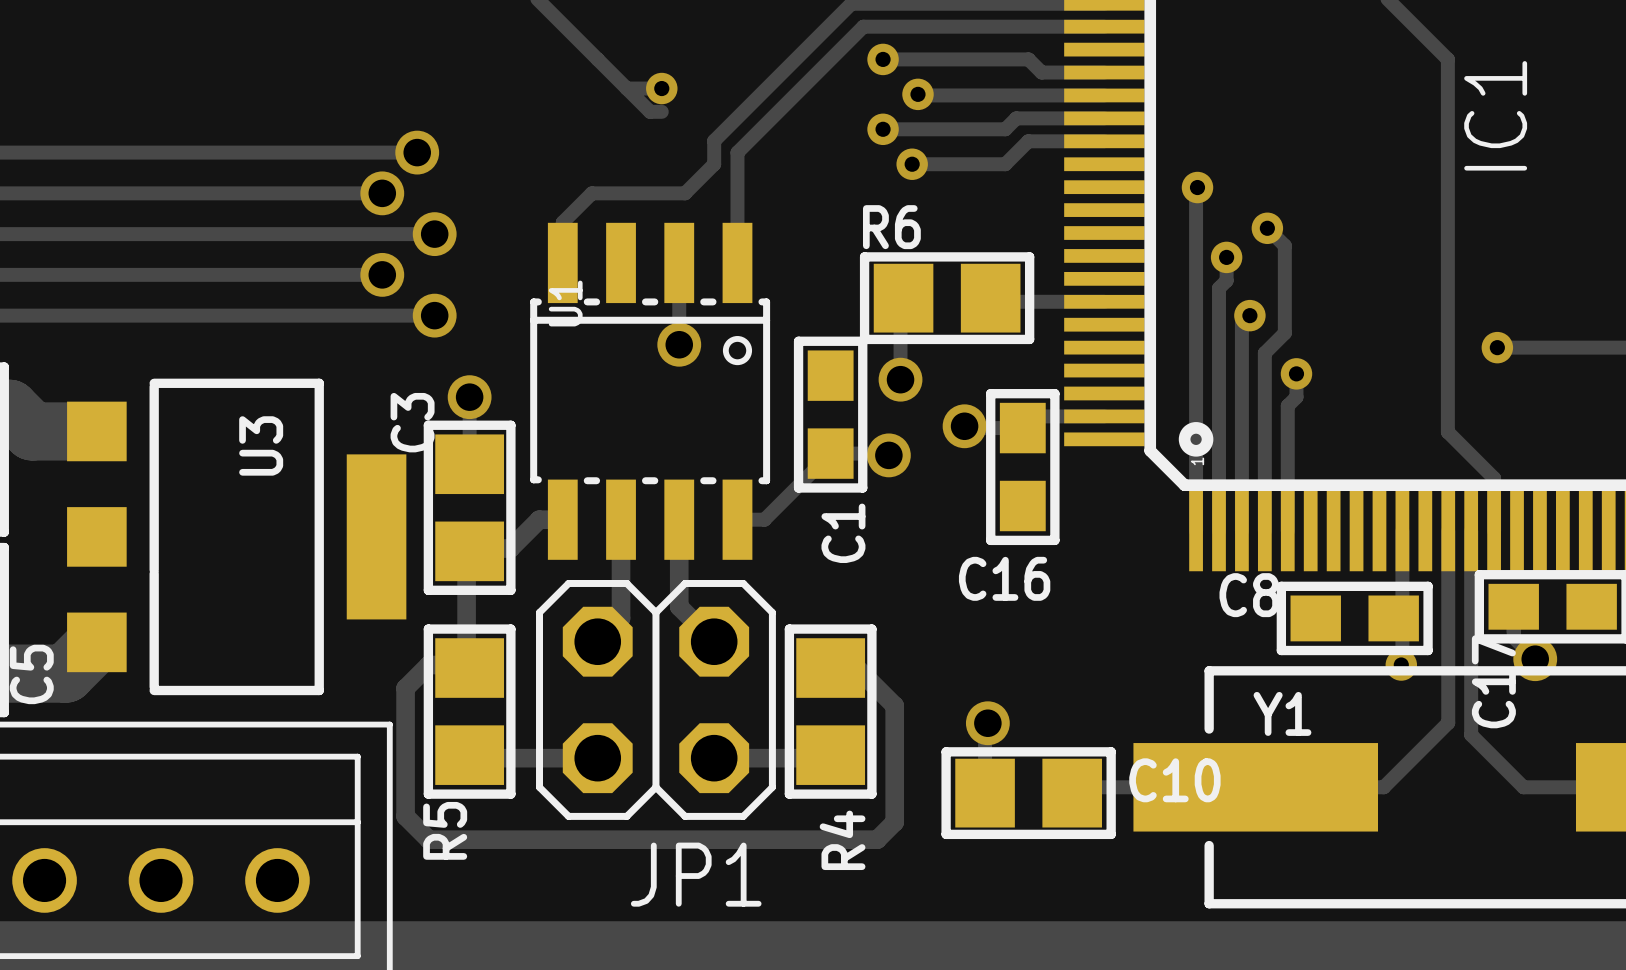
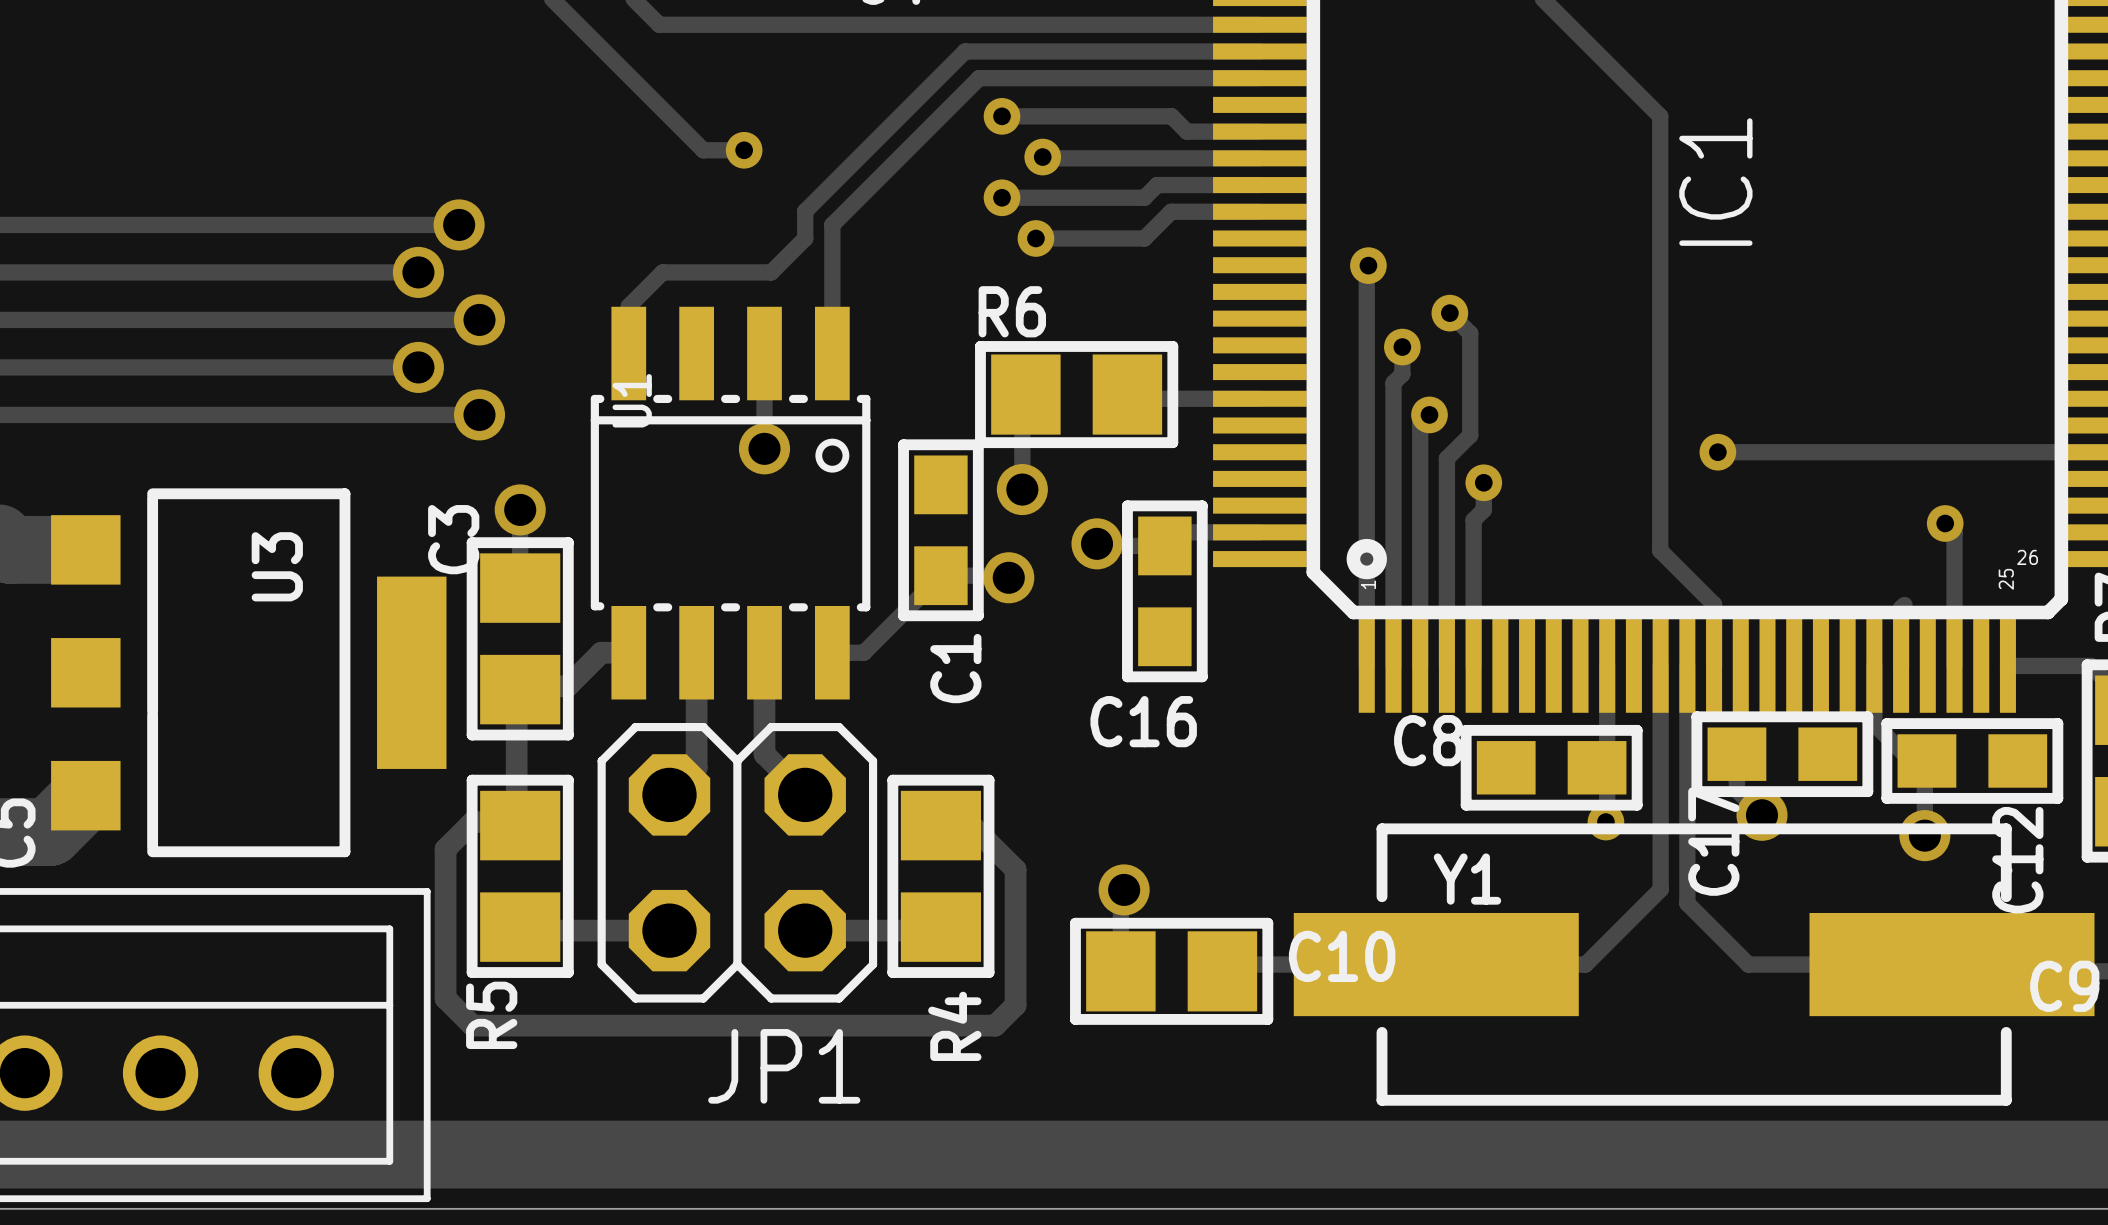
track: (626, 88) (650, 111) (661, 111) -> none

